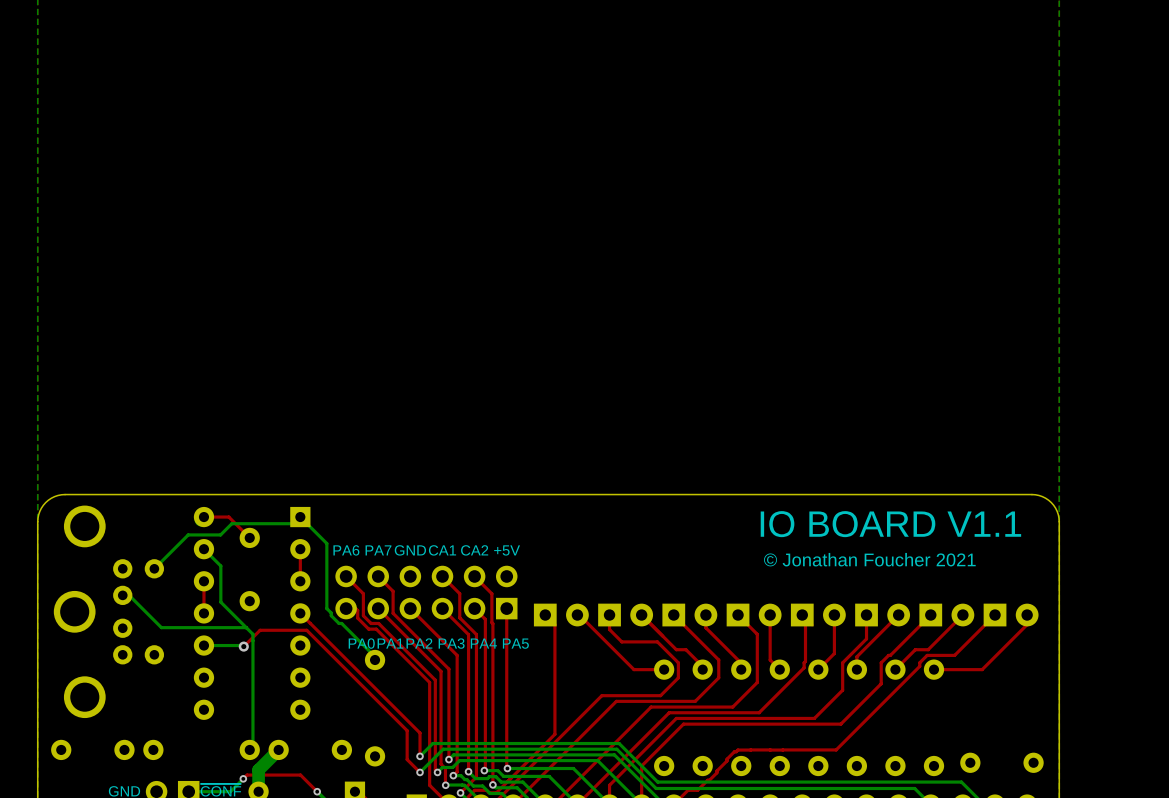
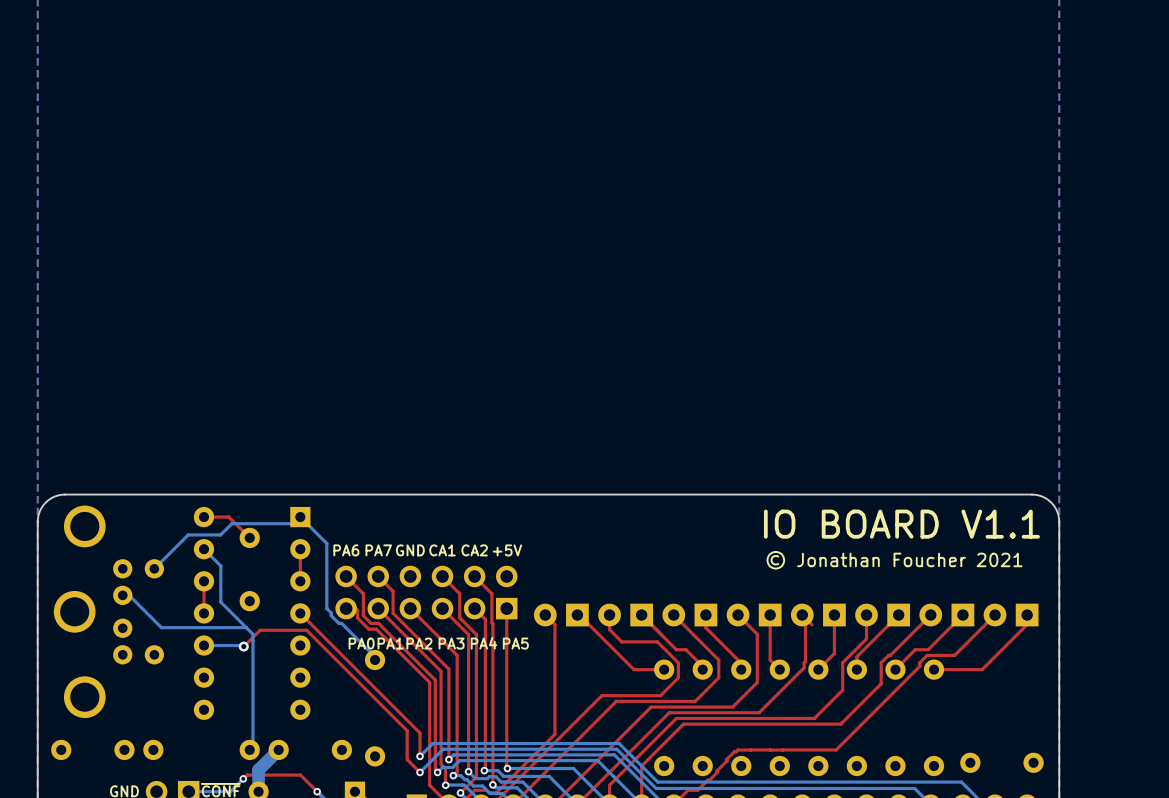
part rotation: 0° (561, 615) -> 180° (561, 615)
part rotation: 0° (625, 615) -> 180° (625, 615)
part rotation: 0° (689, 615) -> 180° (689, 615)
part rotation: 0° (754, 615) -> 180° (754, 615)
part rotation: 0° (818, 615) -> 180° (818, 615)
part rotation: 0° (882, 615) -> 180° (882, 615)
part rotation: 0° (946, 615) -> 180° (946, 615)
part rotation: 0° (1011, 615) -> 180° (1011, 615)

